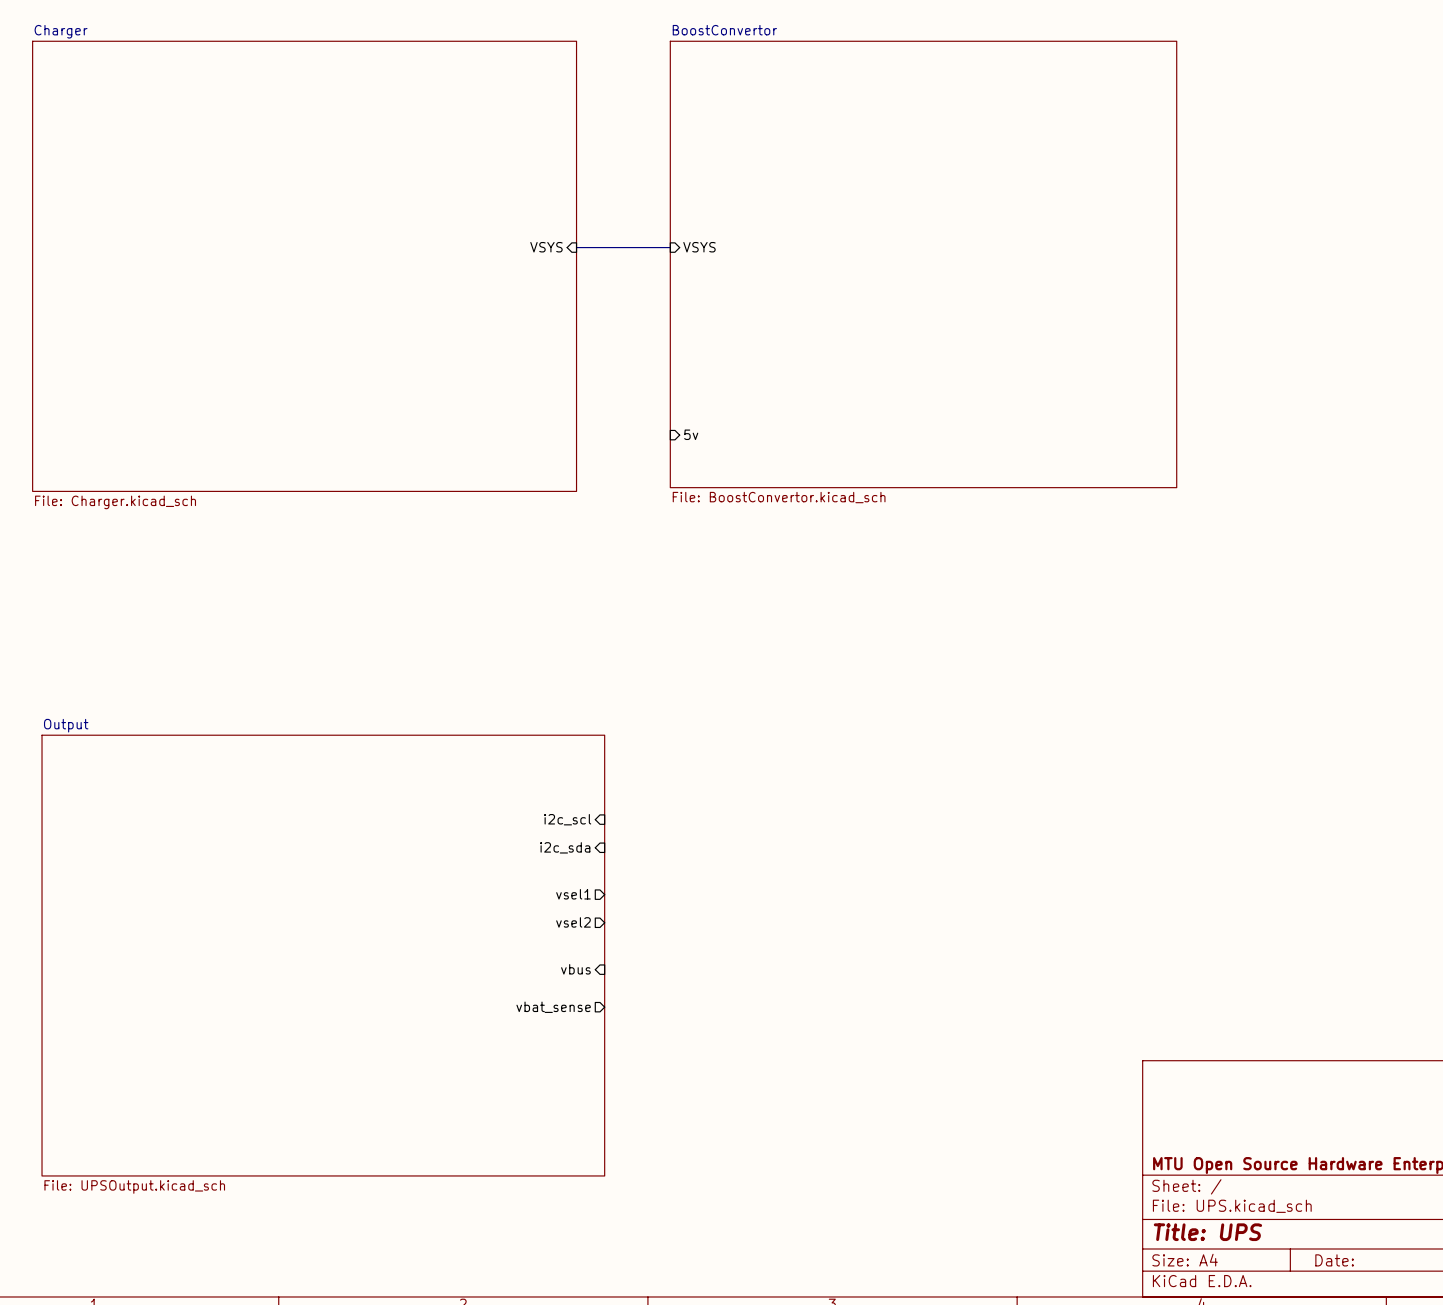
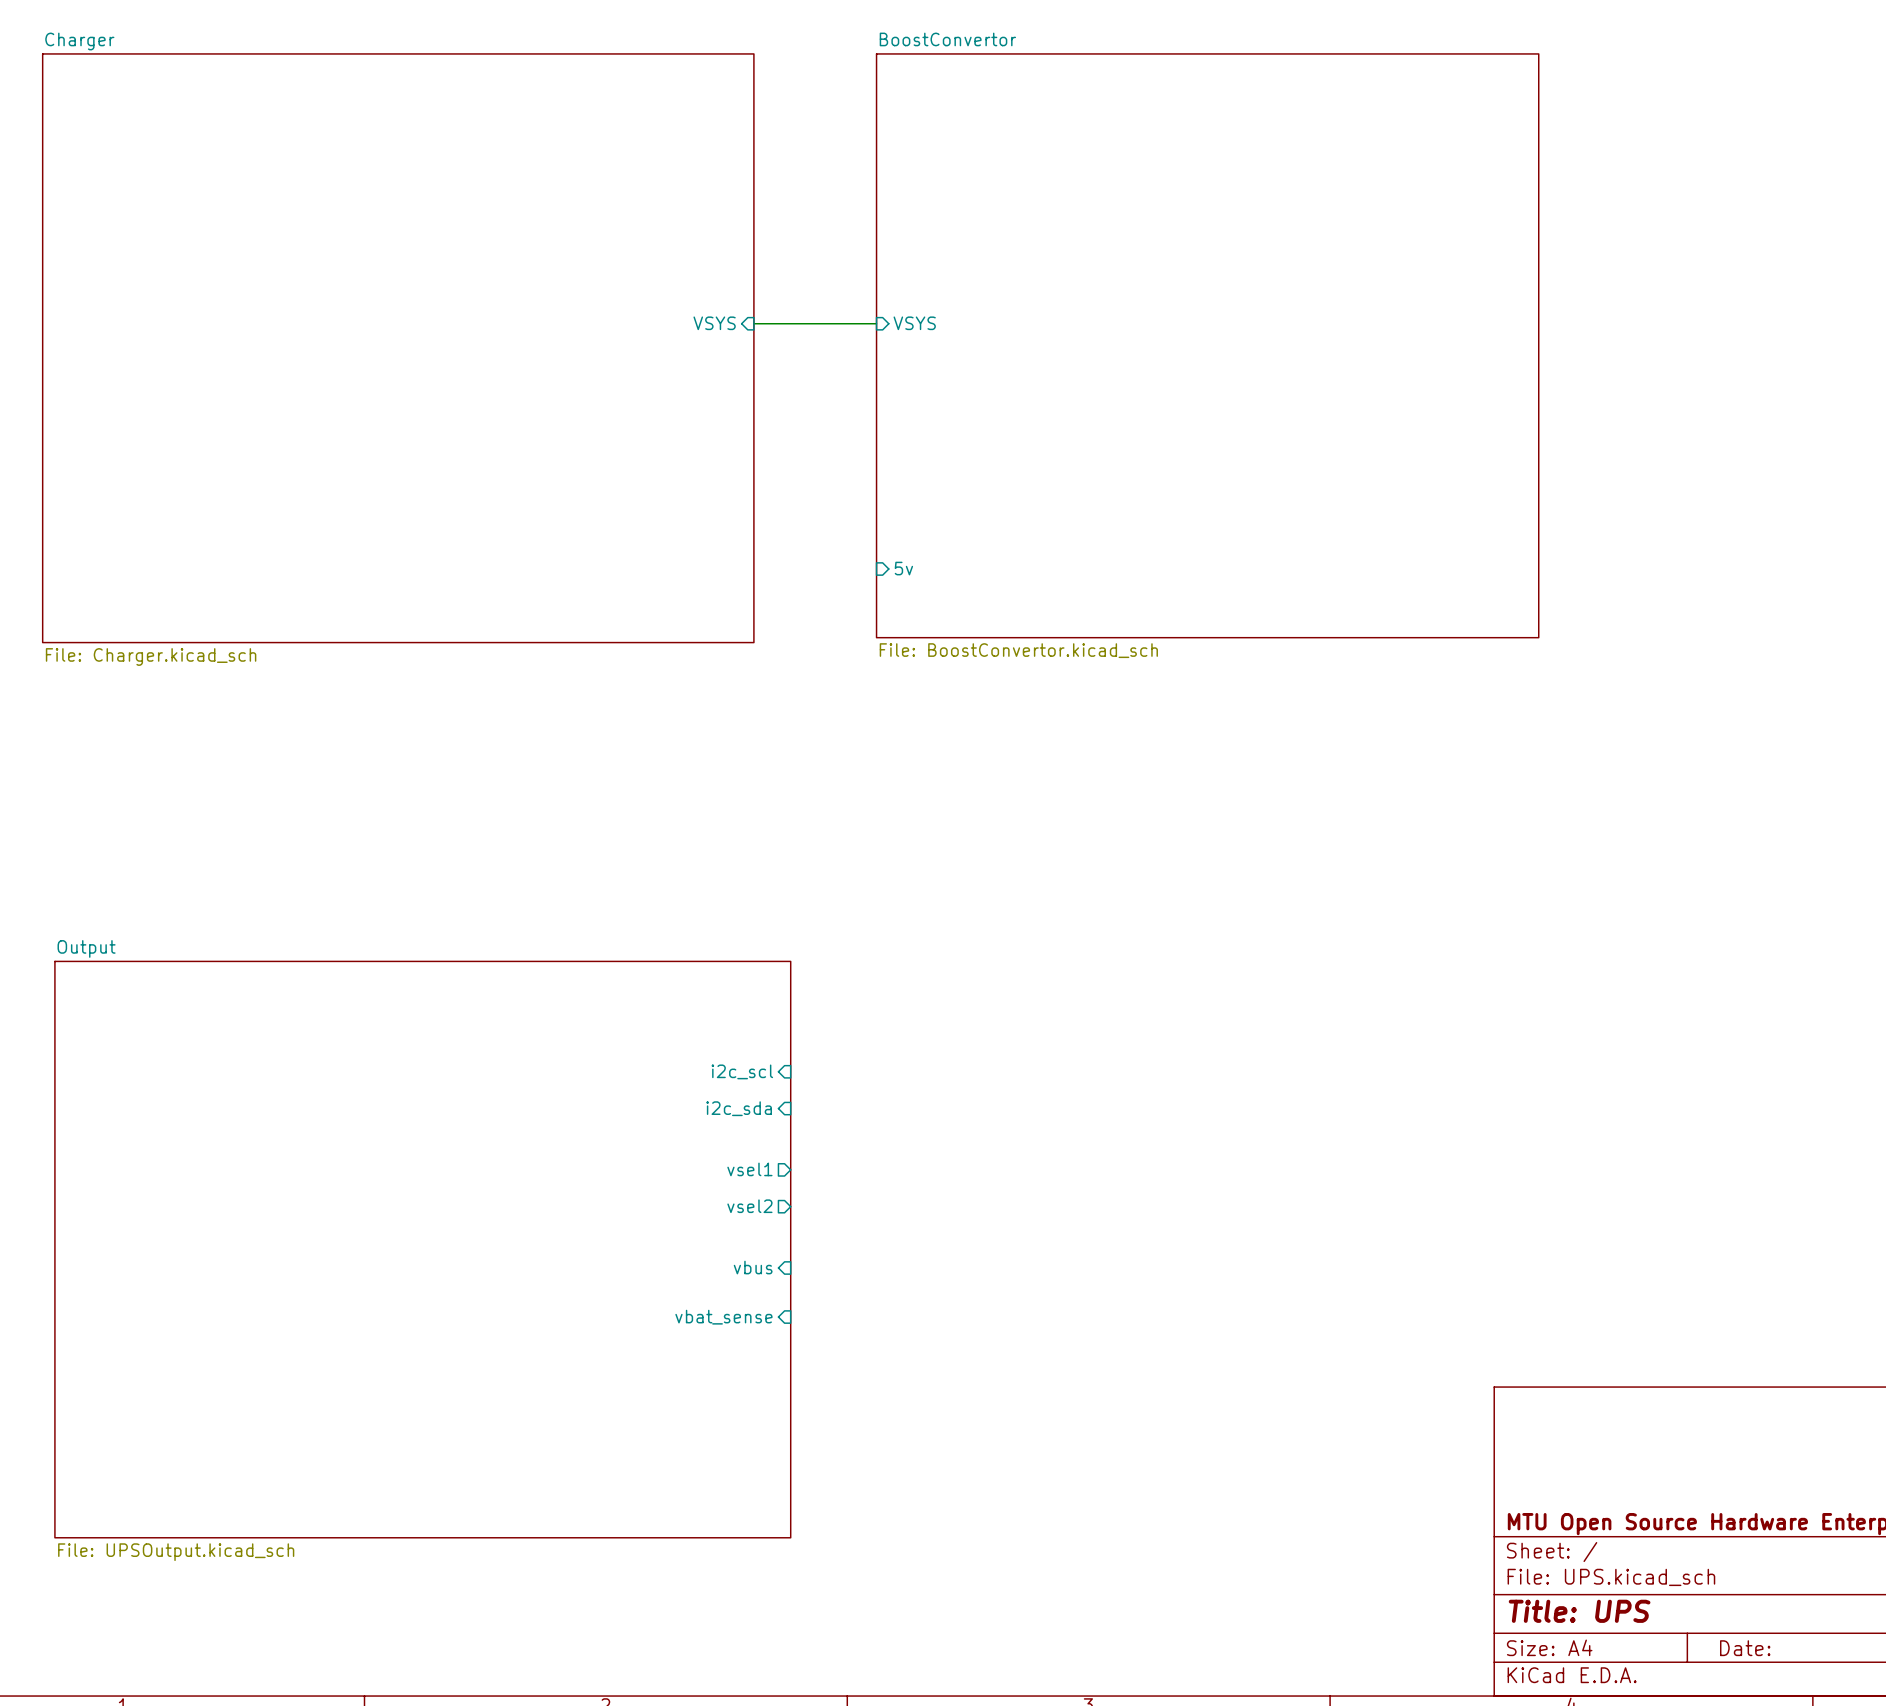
sheet pin shape: output (553, 1007) -> input (723, 1317)

